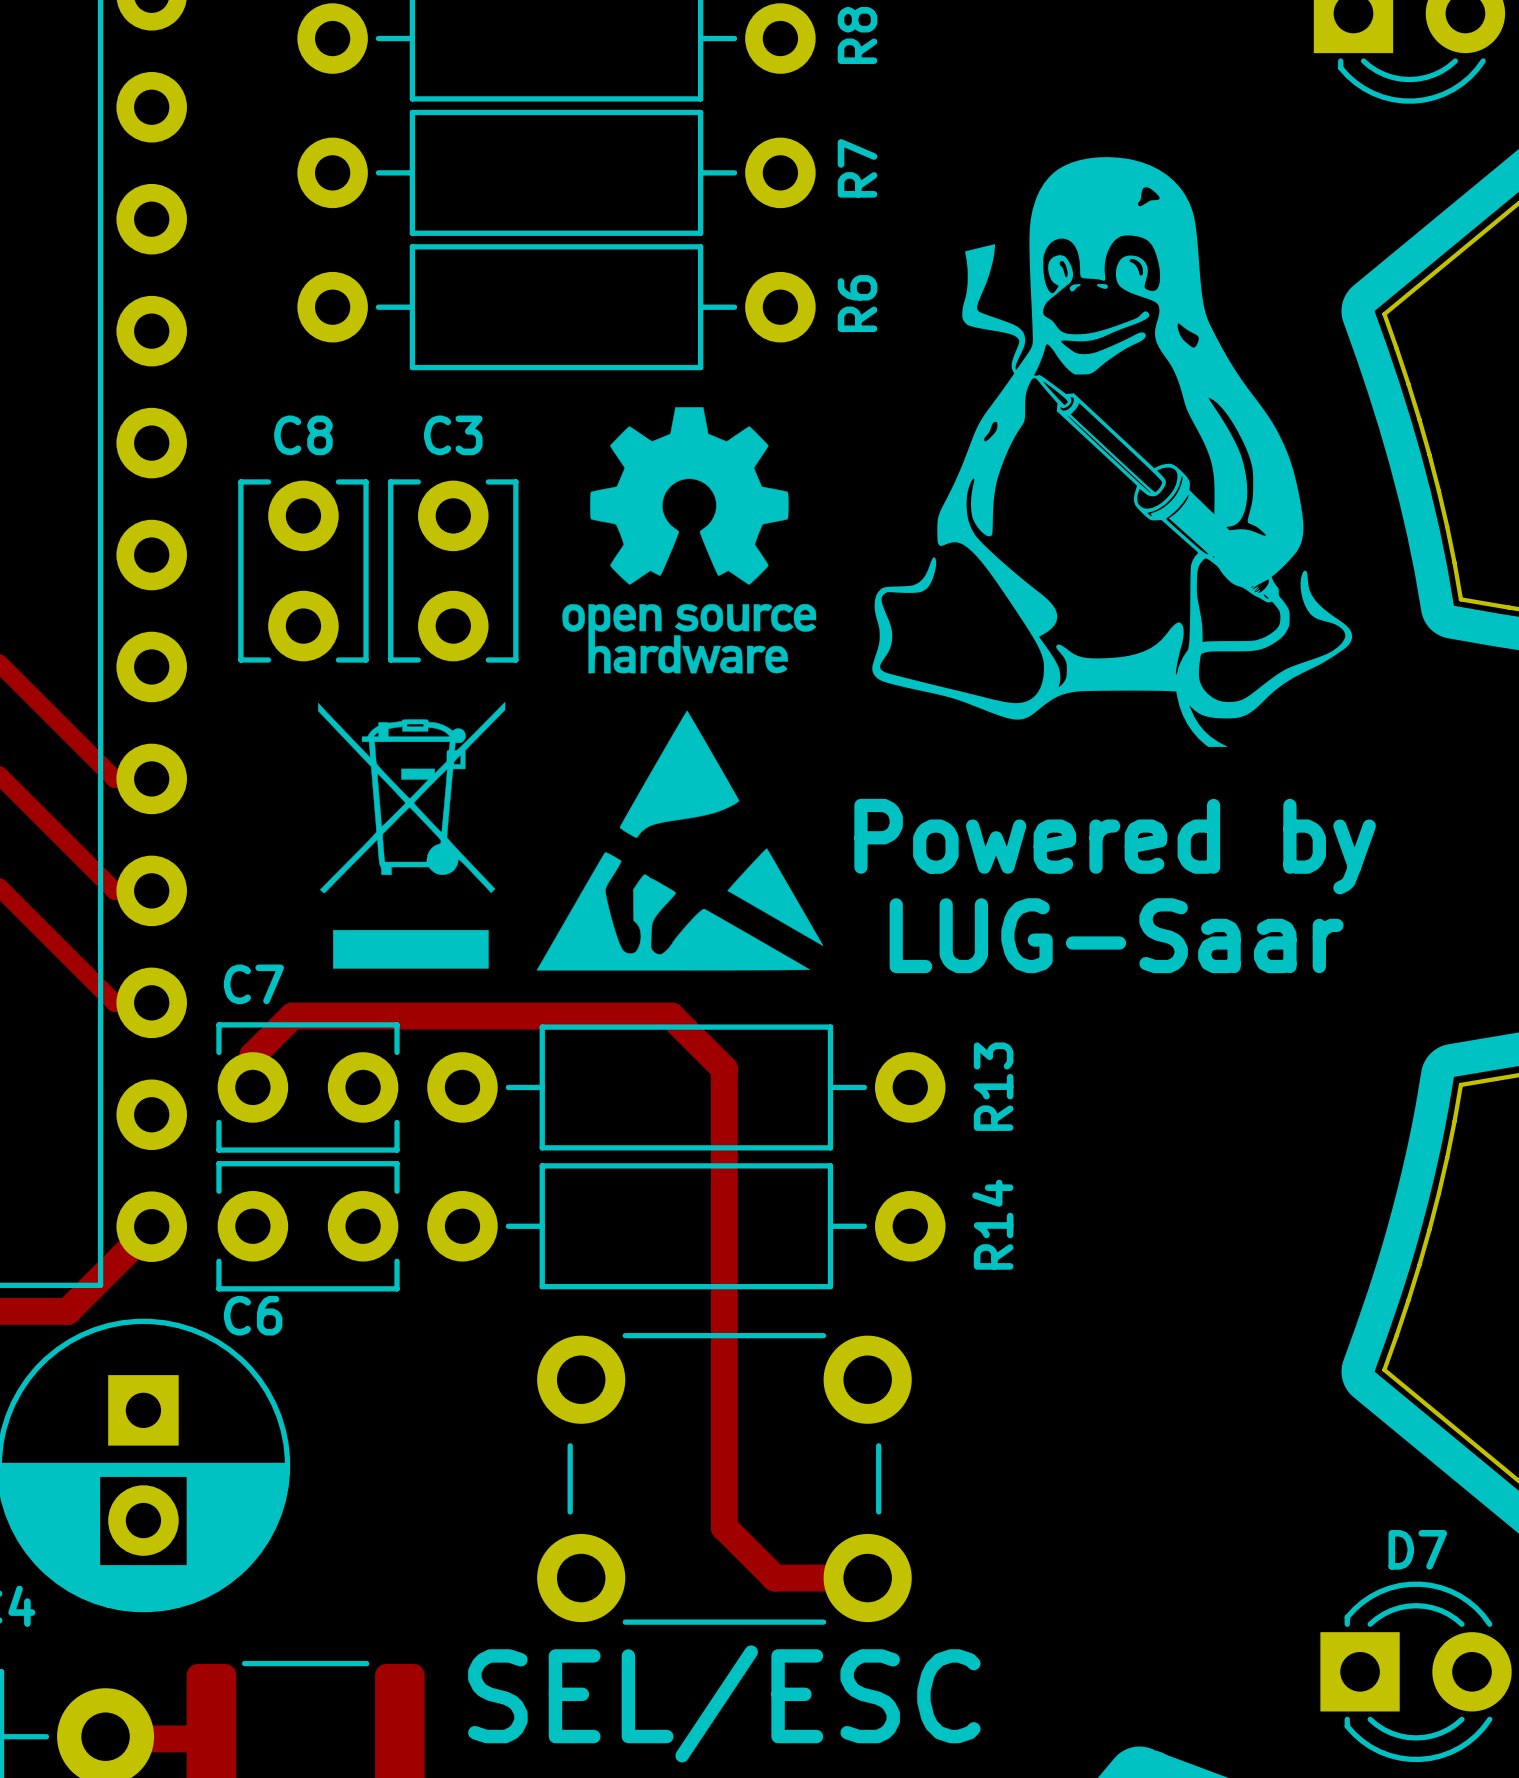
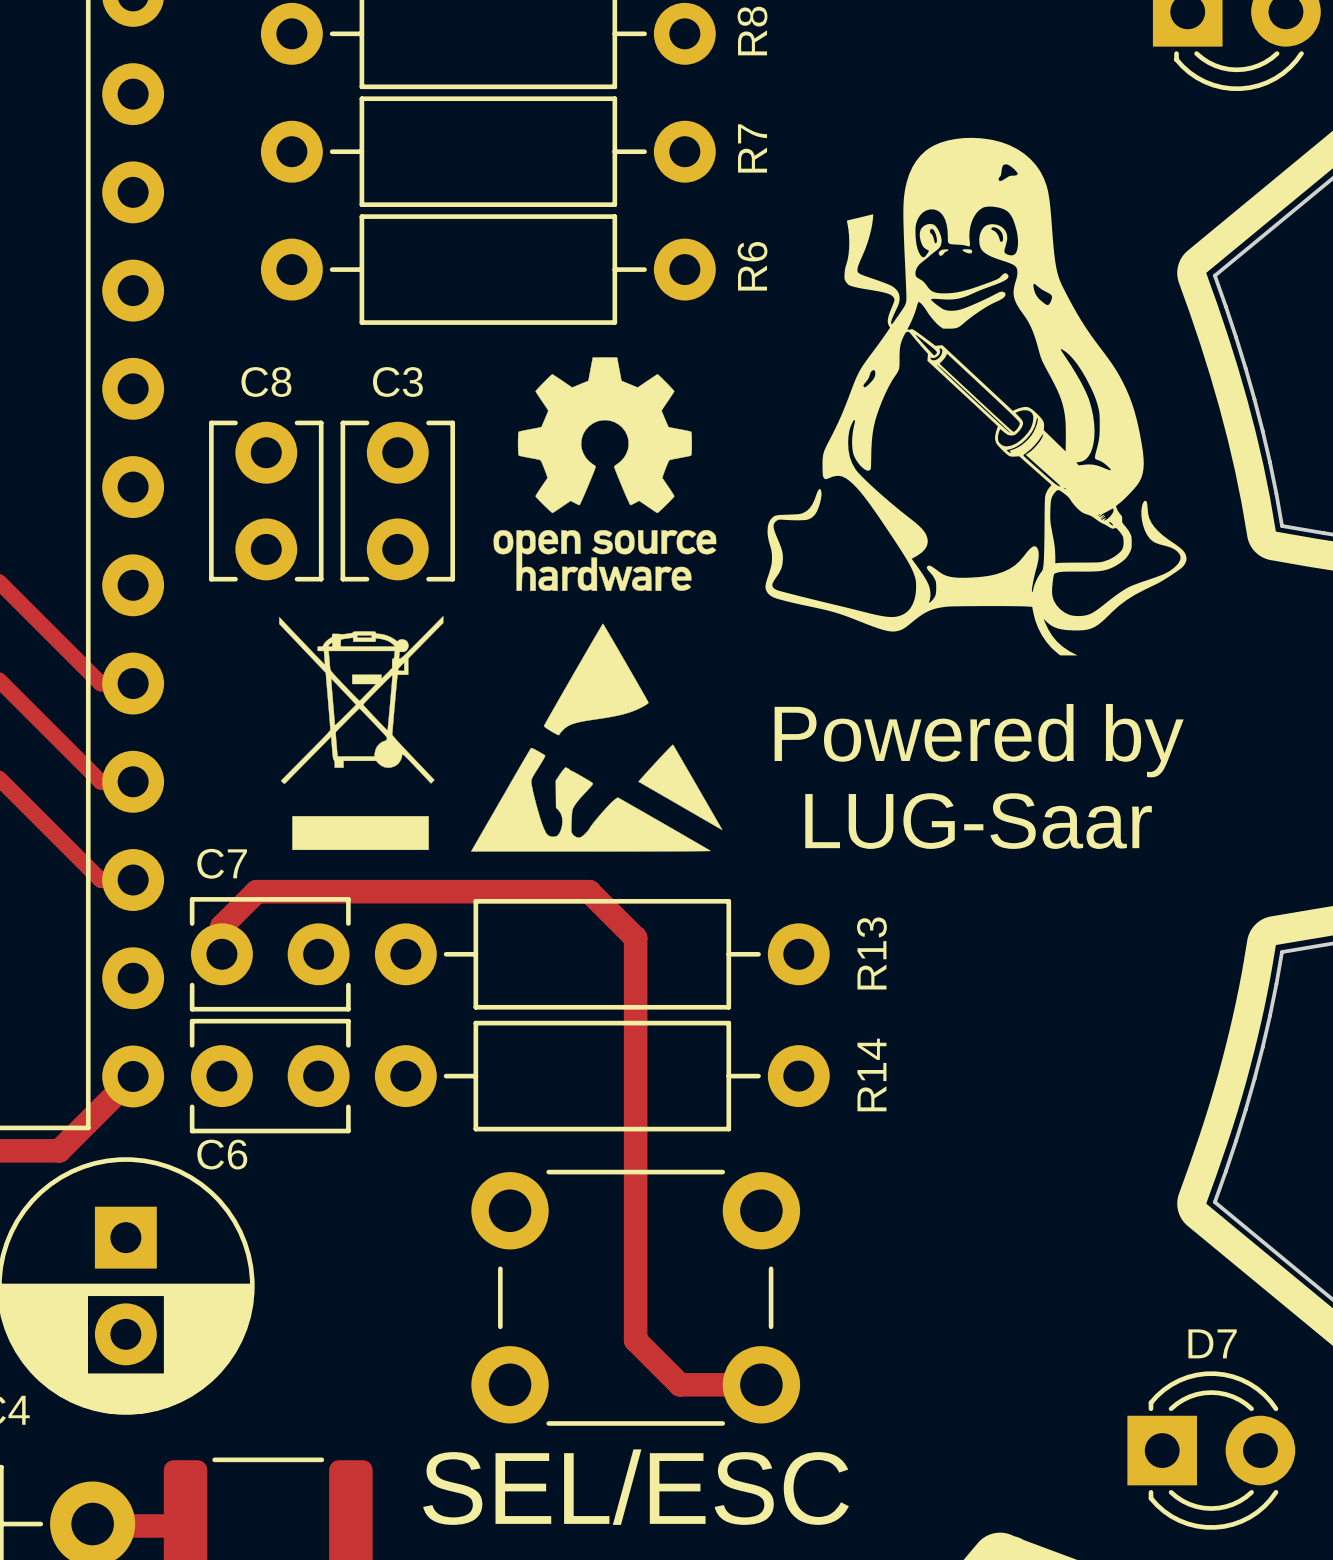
D7 position: (1416, 1671) -> (1211, 1450)

